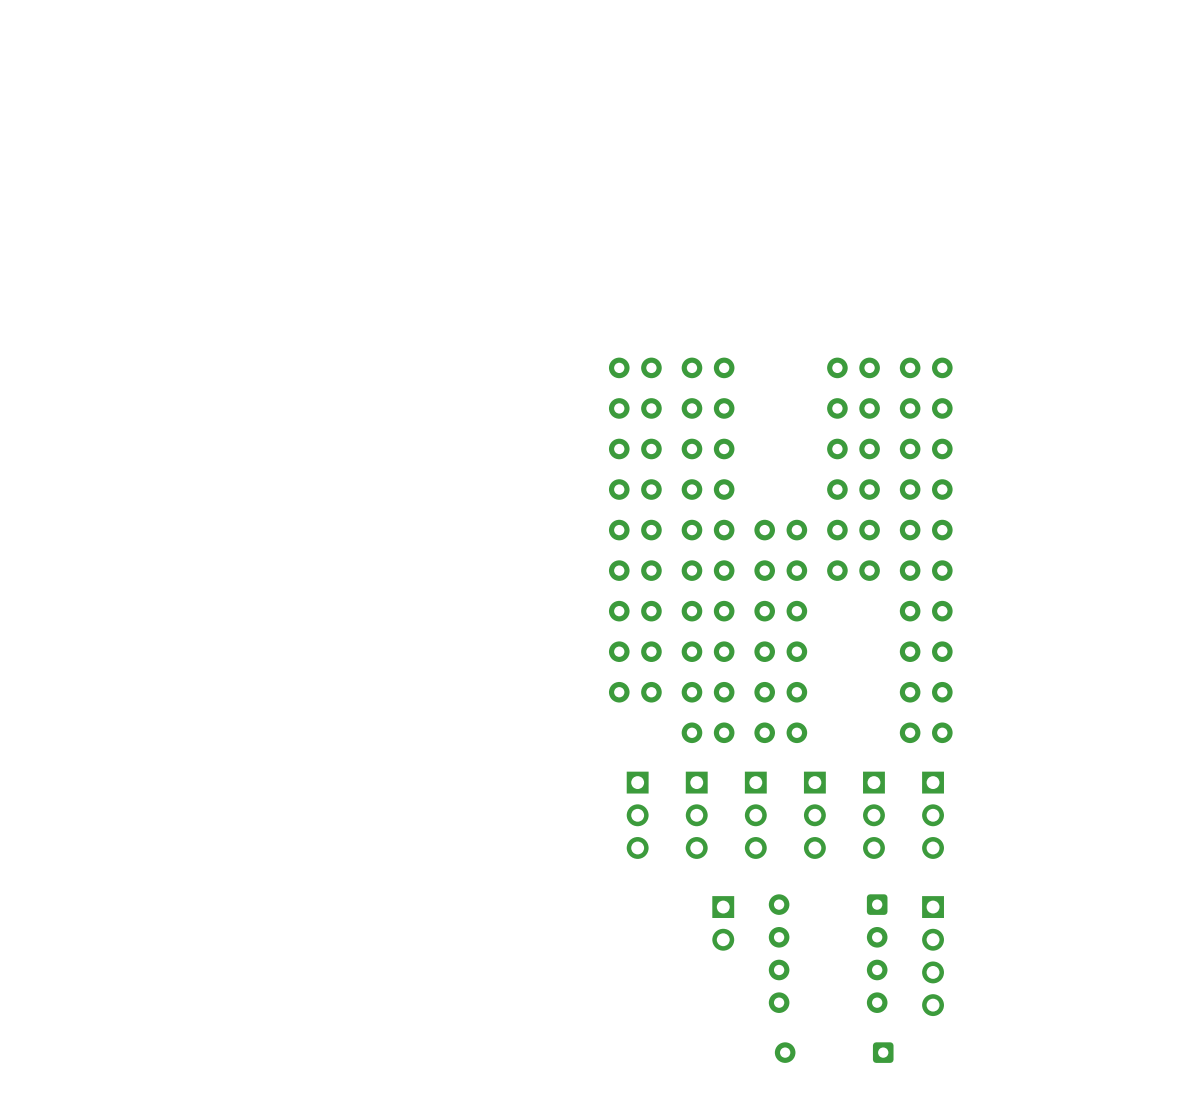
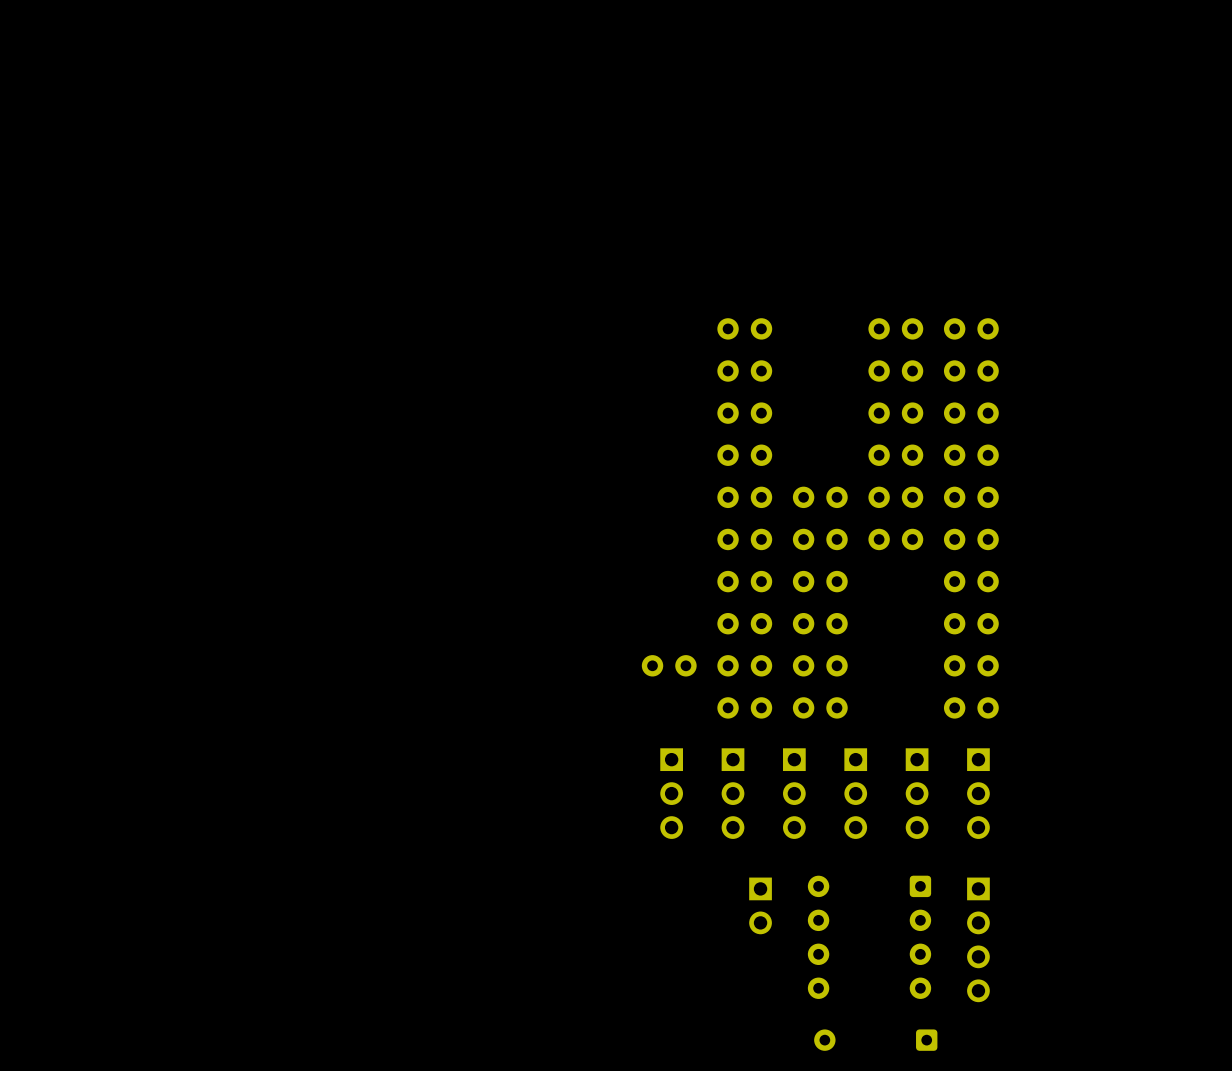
part: (635, 367) -> none
part: (635, 408) -> none
part: (635, 448) -> none
part: (635, 489) -> none
part: (635, 530) -> none
part: (635, 570) -> none
part: (635, 611) -> none
part: (635, 651) -> none

